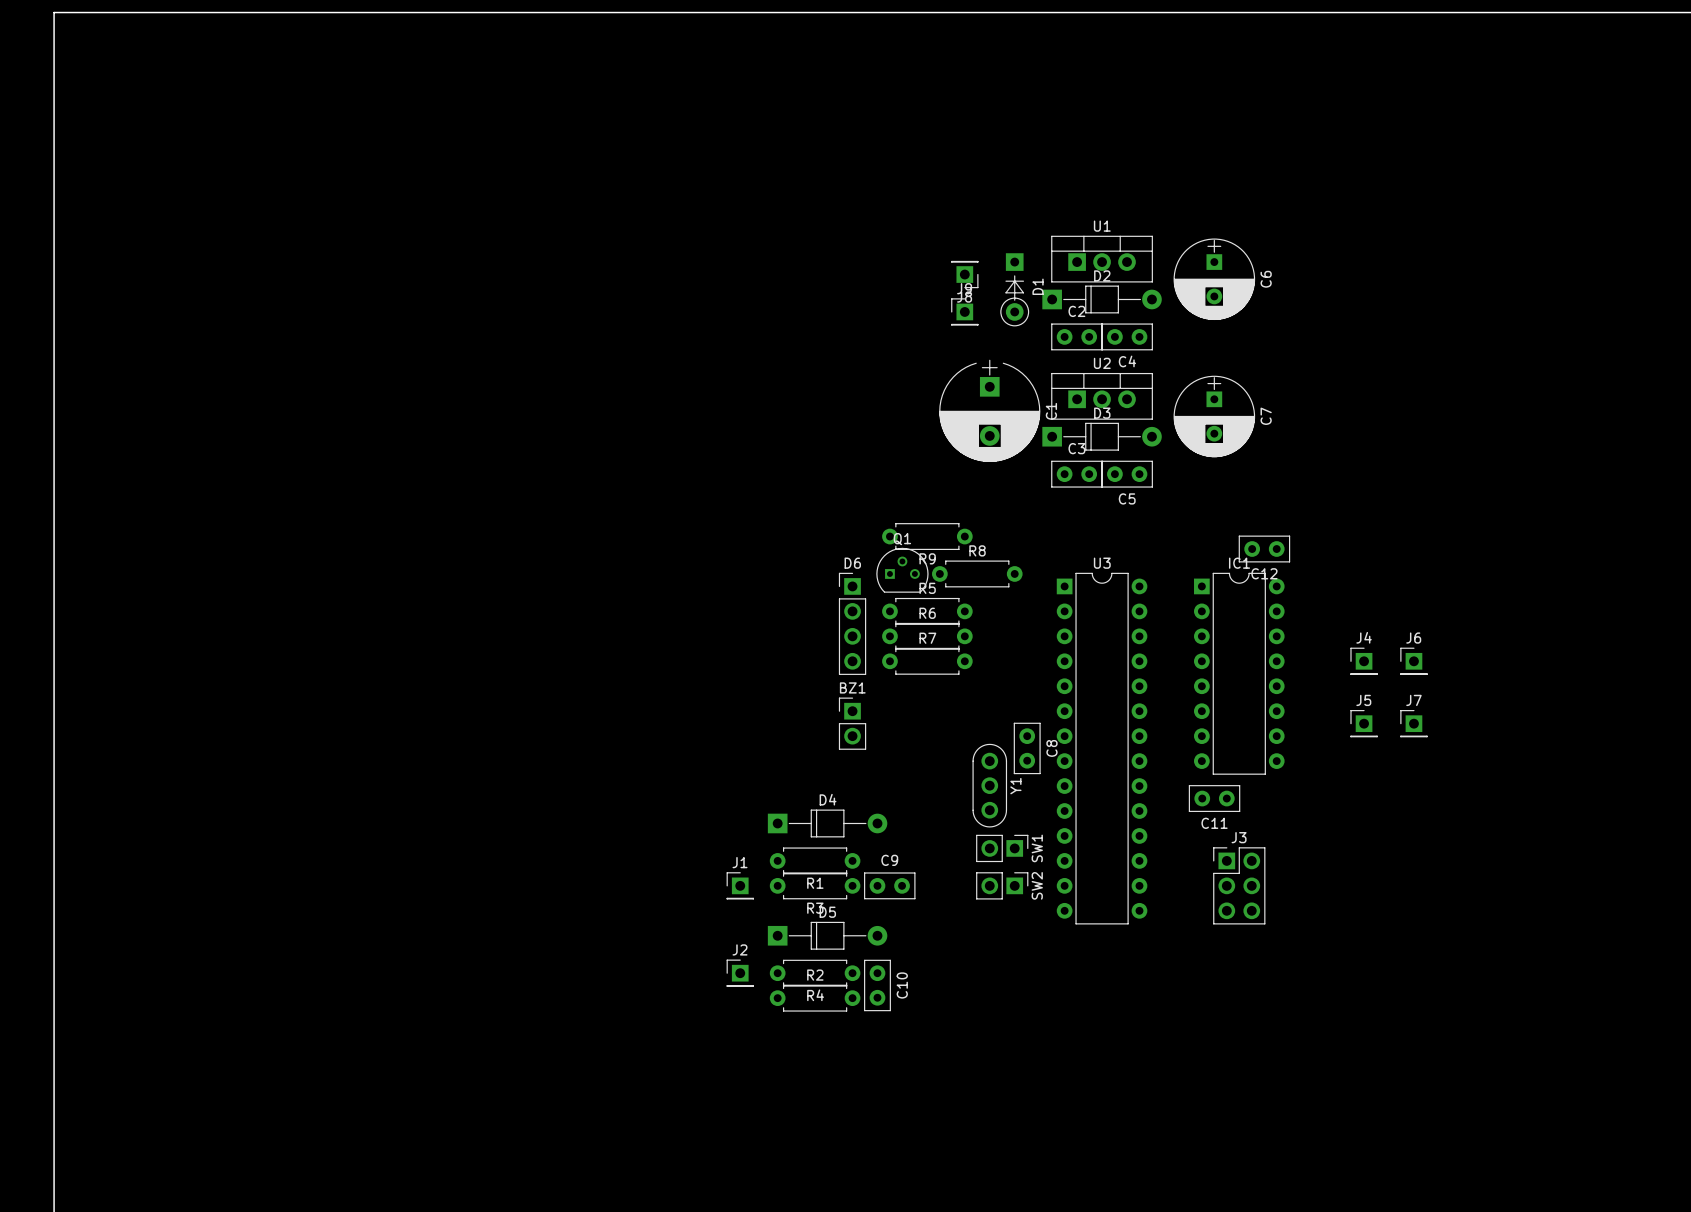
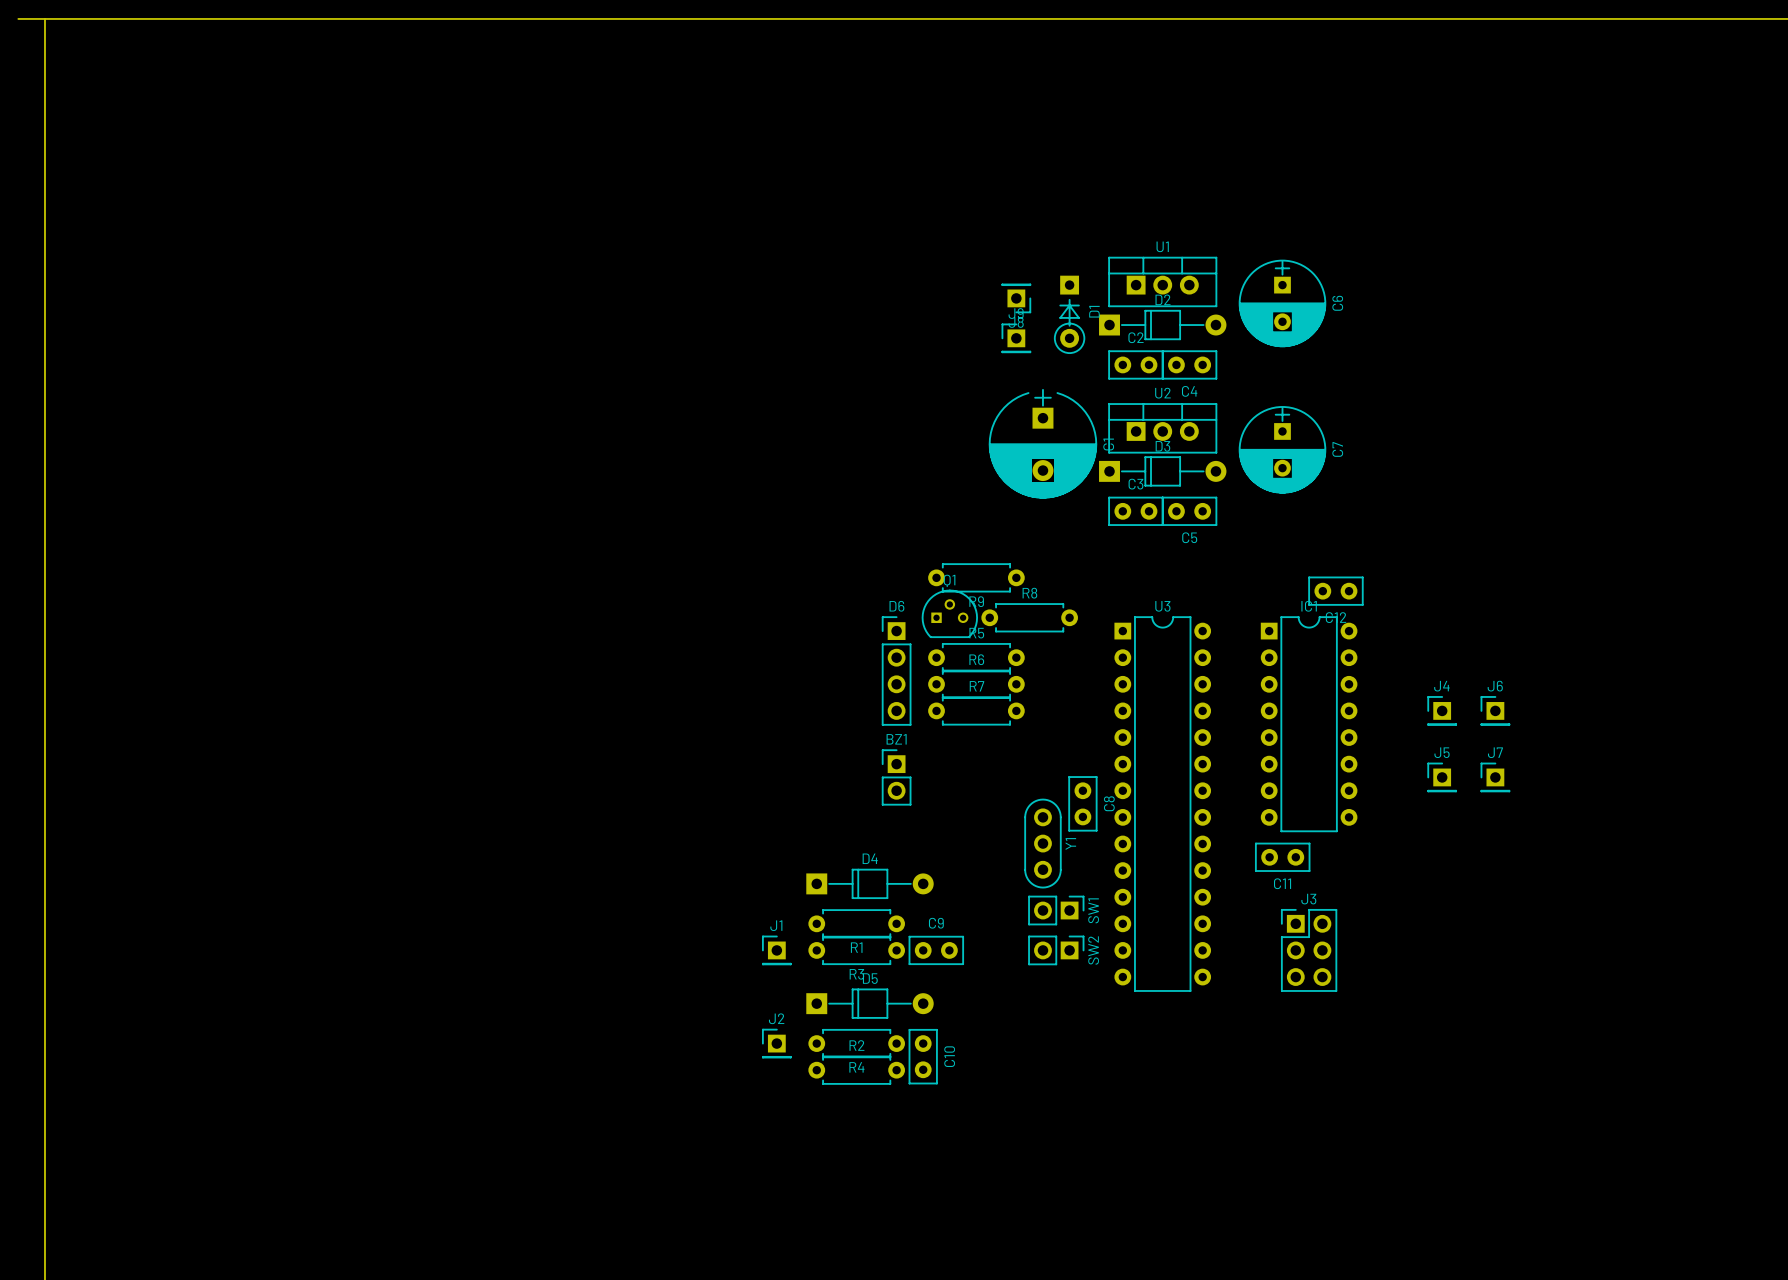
board edge: none -> (18, 18) (44, 18)

